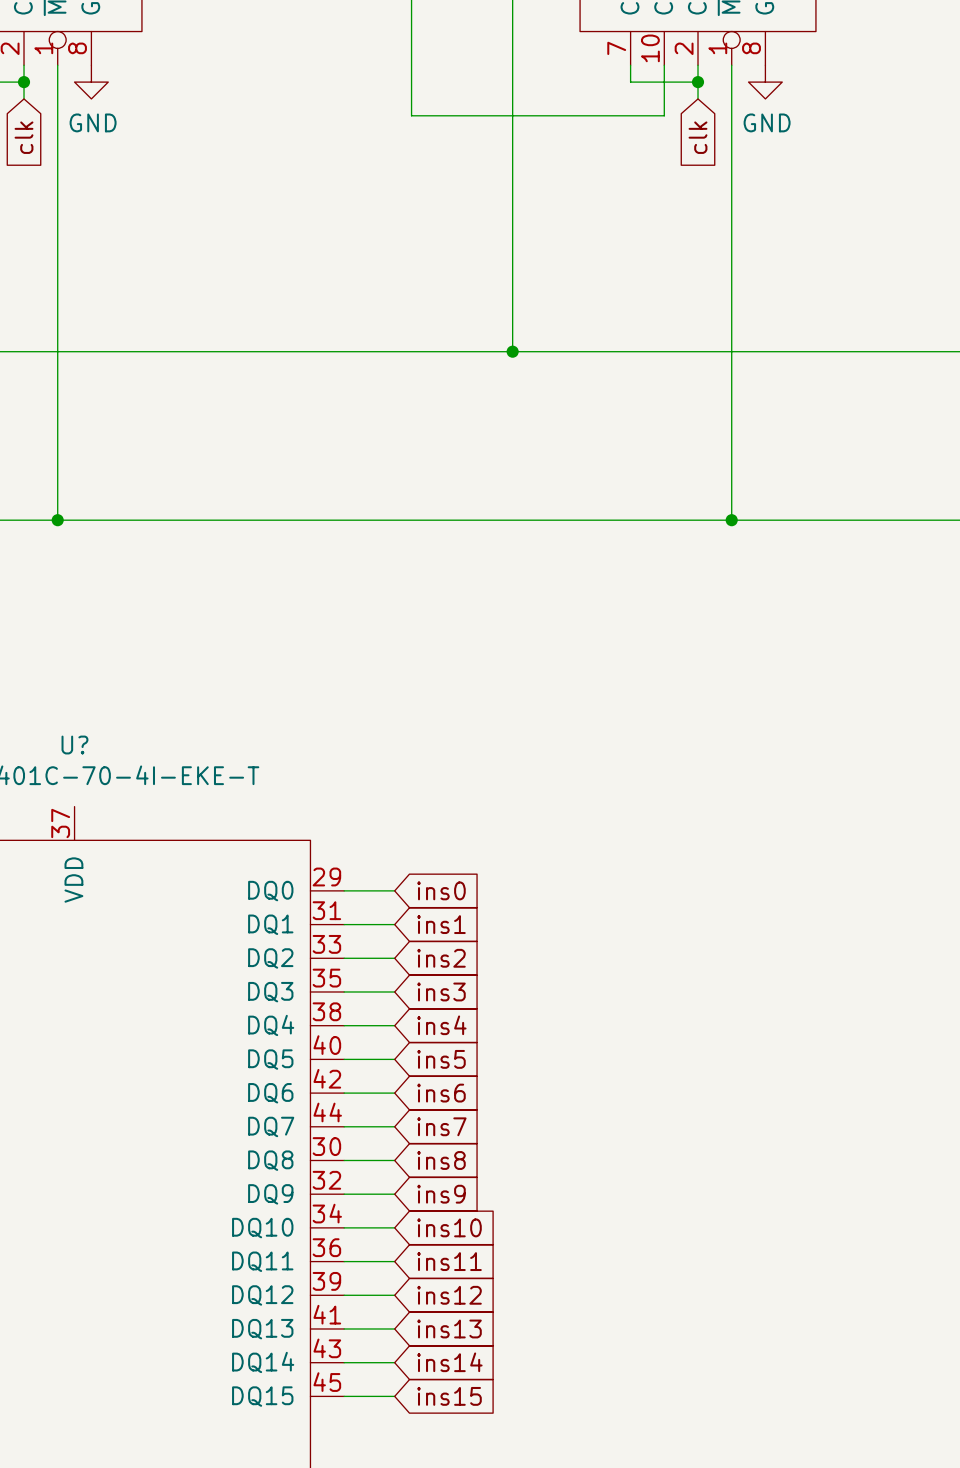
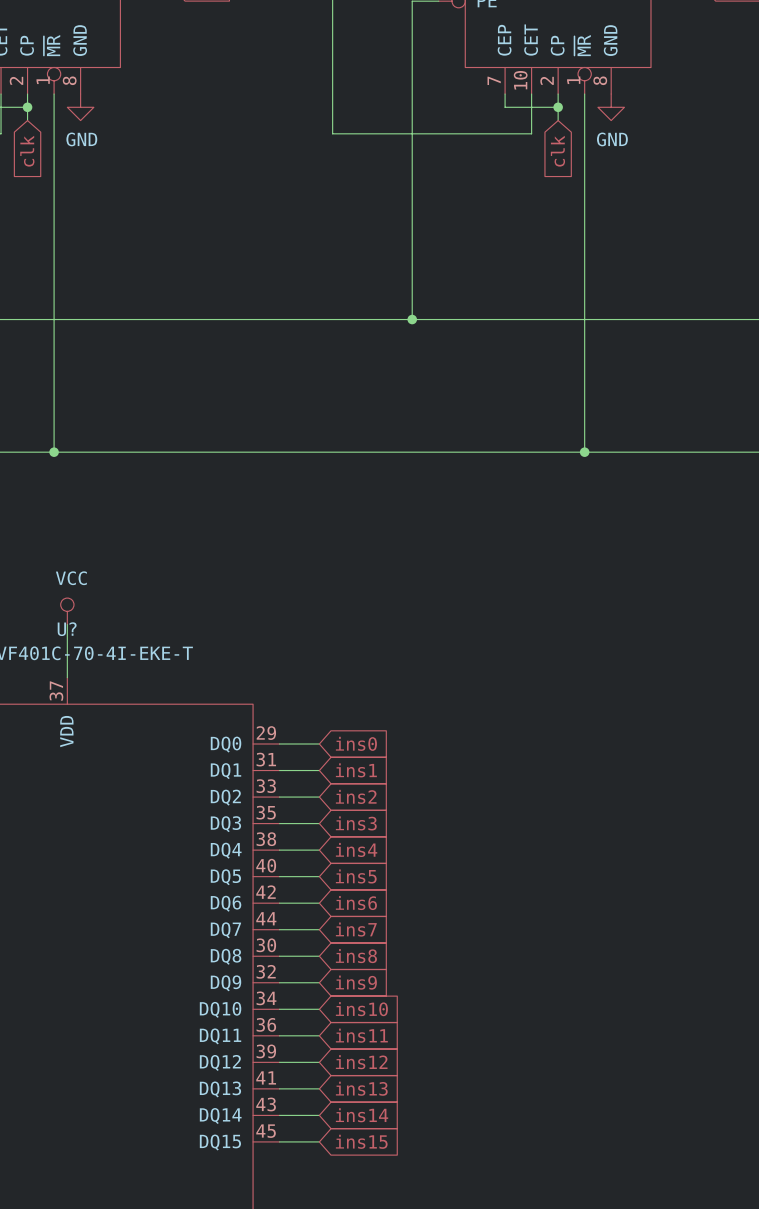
power symbol: none -> VCC (67, 611)
wire: none -> (67, 624) (67, 677)

